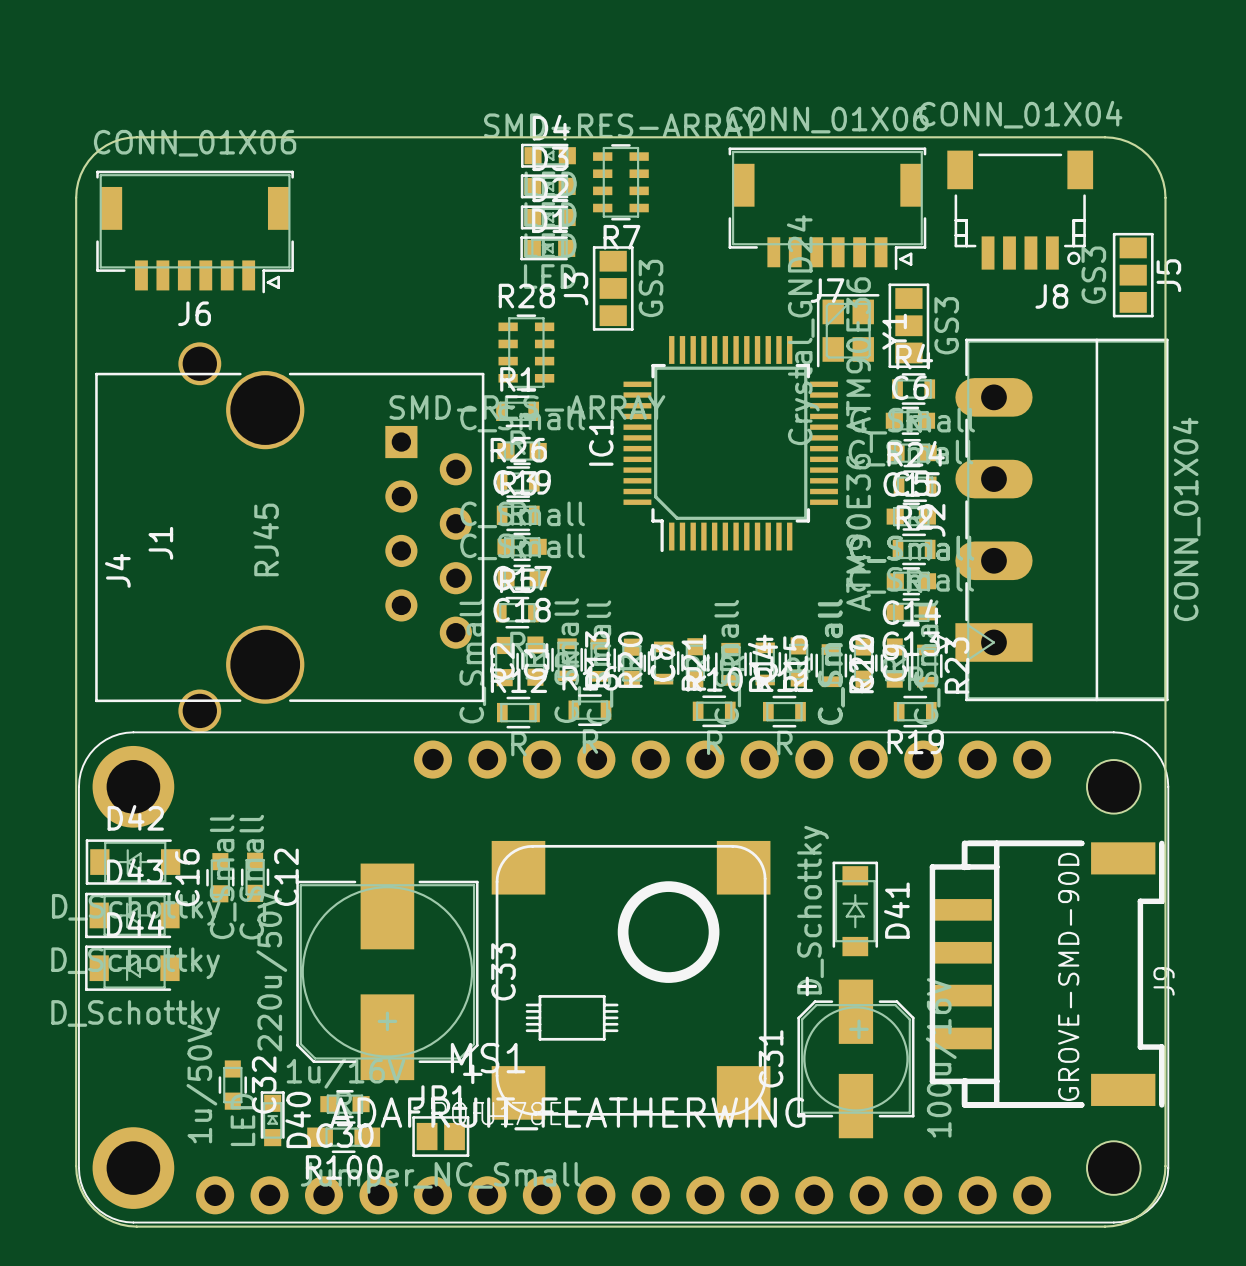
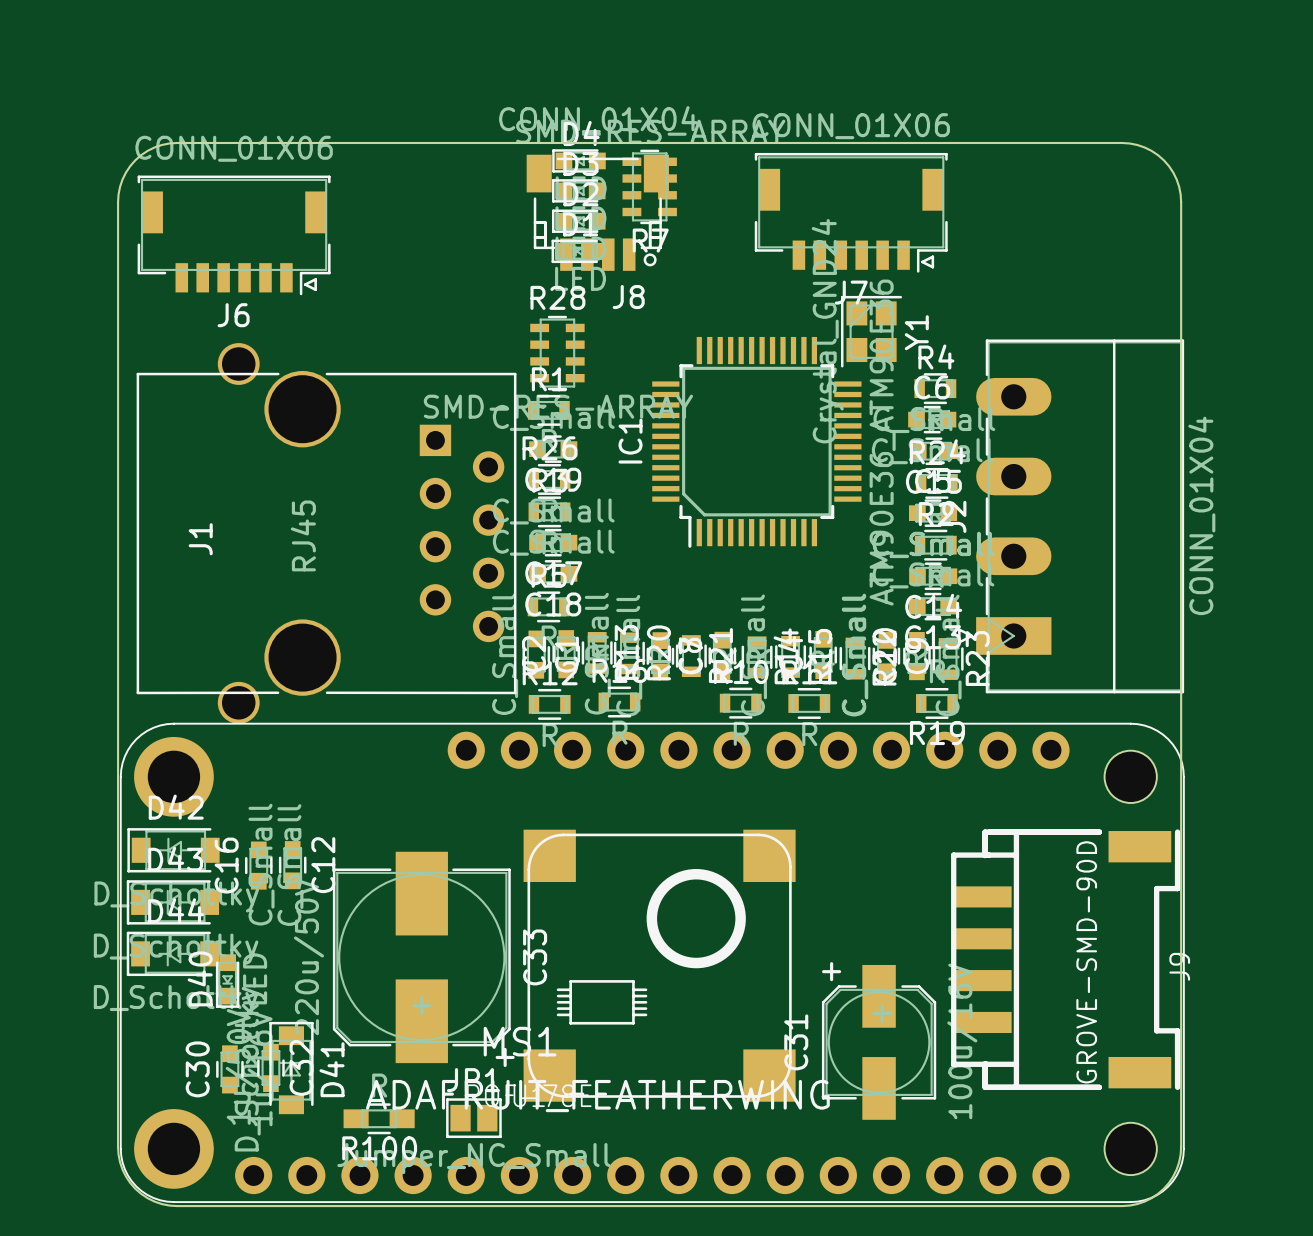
J8 position: (1020, 210) -> (597, 212)
J5: GS3 (1133, 275) -> none
J3: GS3 (613, 288) -> none
J4: GS3 (908, 325) -> none
D41 position: (855, 908) -> (291, 1068)
C30 rotation: 0° (344, 1104) -> 90° clockwise (229, 1069)
C30 position: (344, 1104) -> (229, 1069)
D40 rotation: 0° (272, 1118) -> 180° (227, 981)
D40 position: (272, 1118) -> (227, 981)

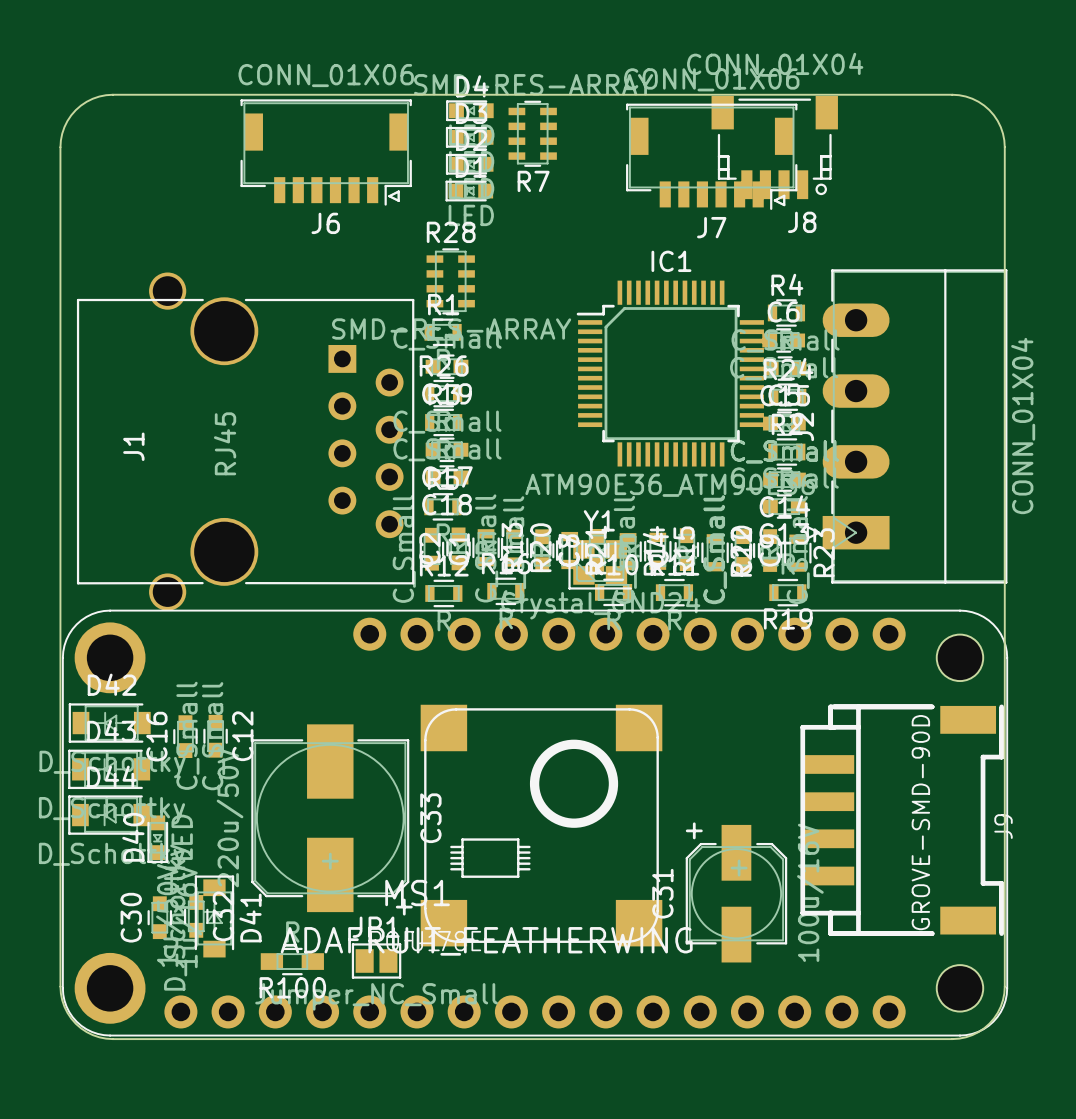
J8 position: (597, 212) -> (774, 147)
J6 position: (234, 235) -> (326, 152)
Y1 rotation: 0° (871, 331) -> 90° counterclockwise (600, 562)
Y1 position: (871, 331) -> (600, 562)
IC1 rotation: 0° (756, 442) -> 90° clockwise (670, 373)

